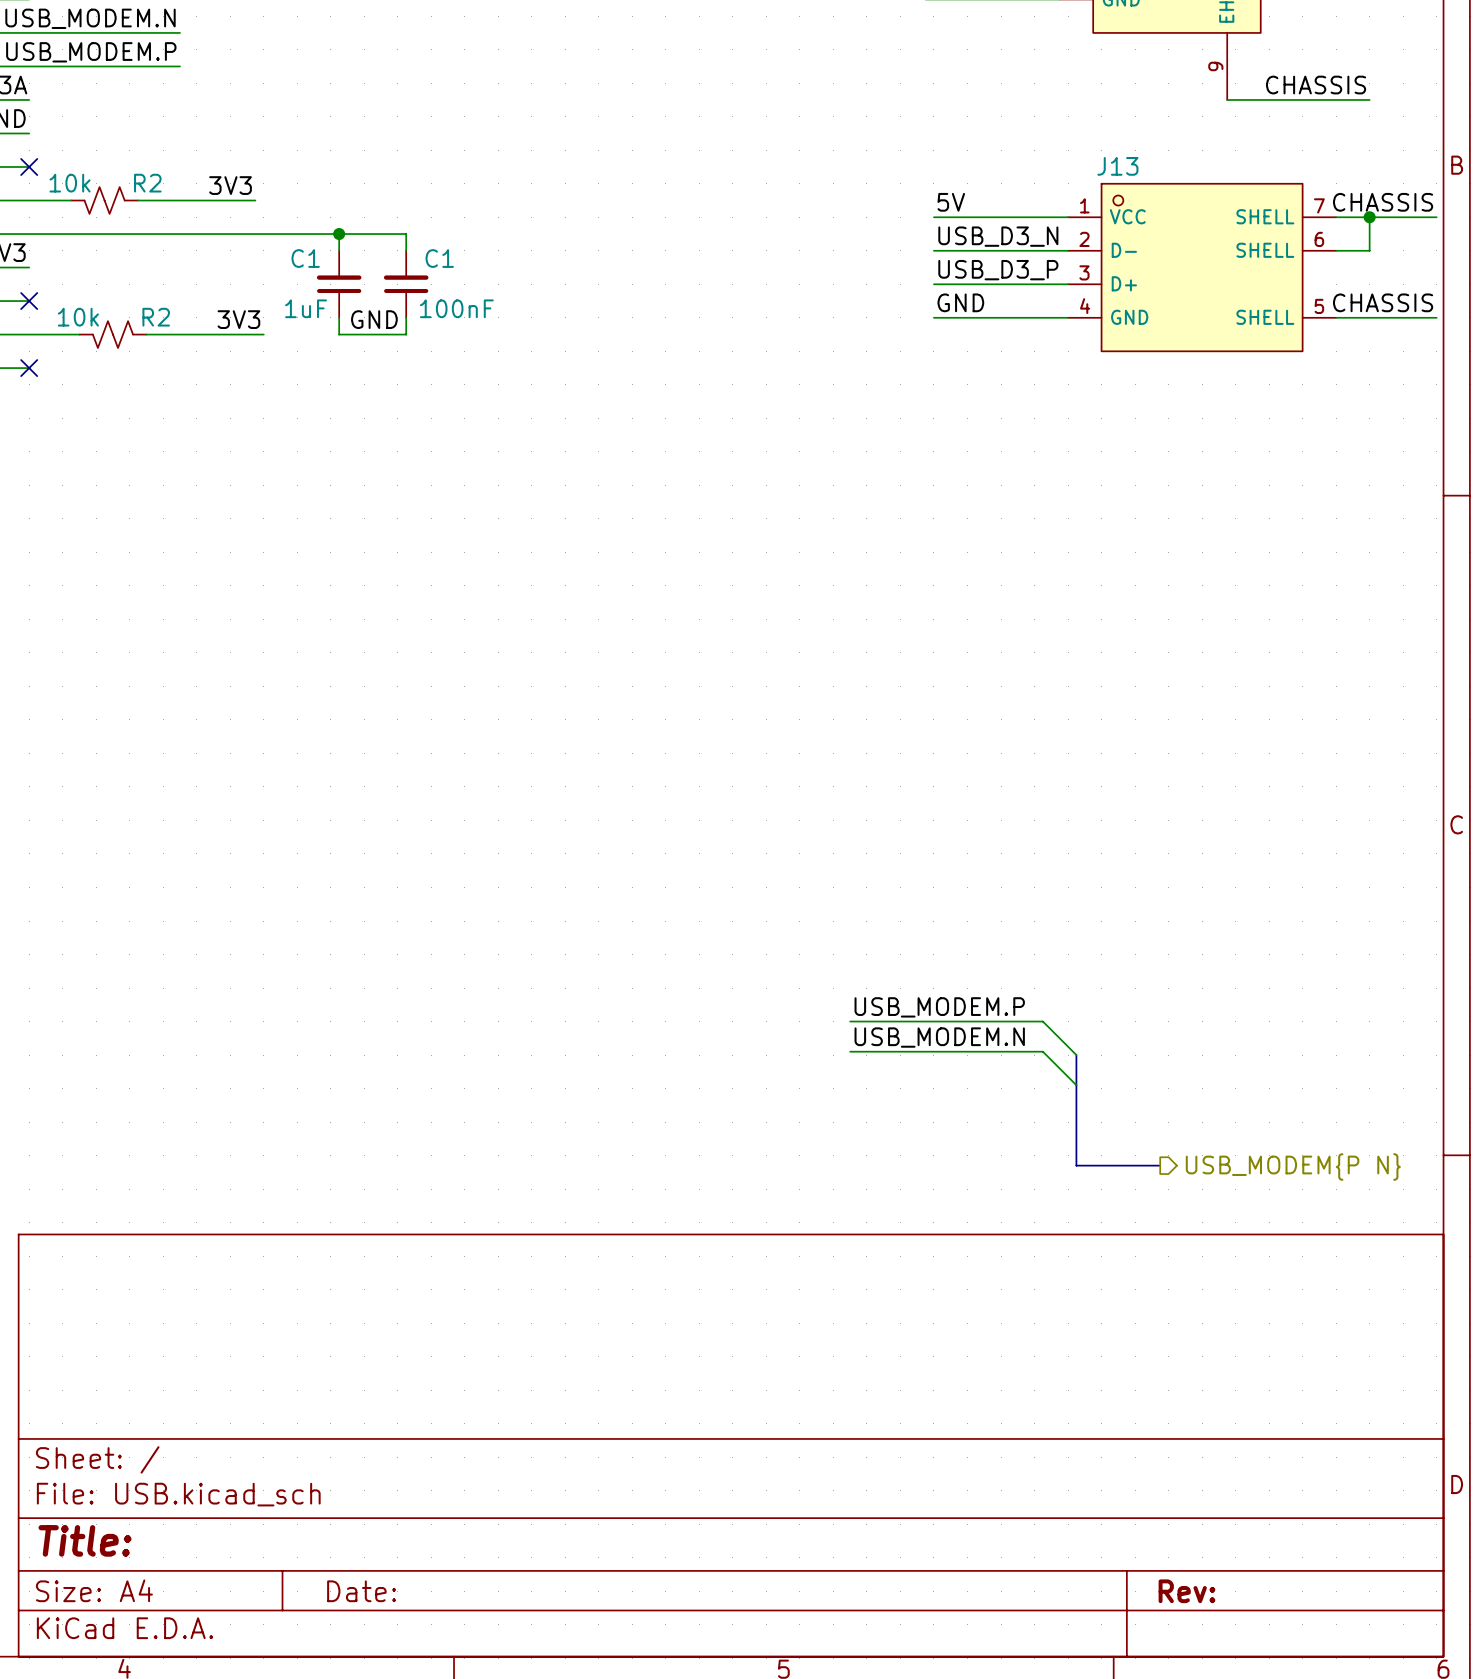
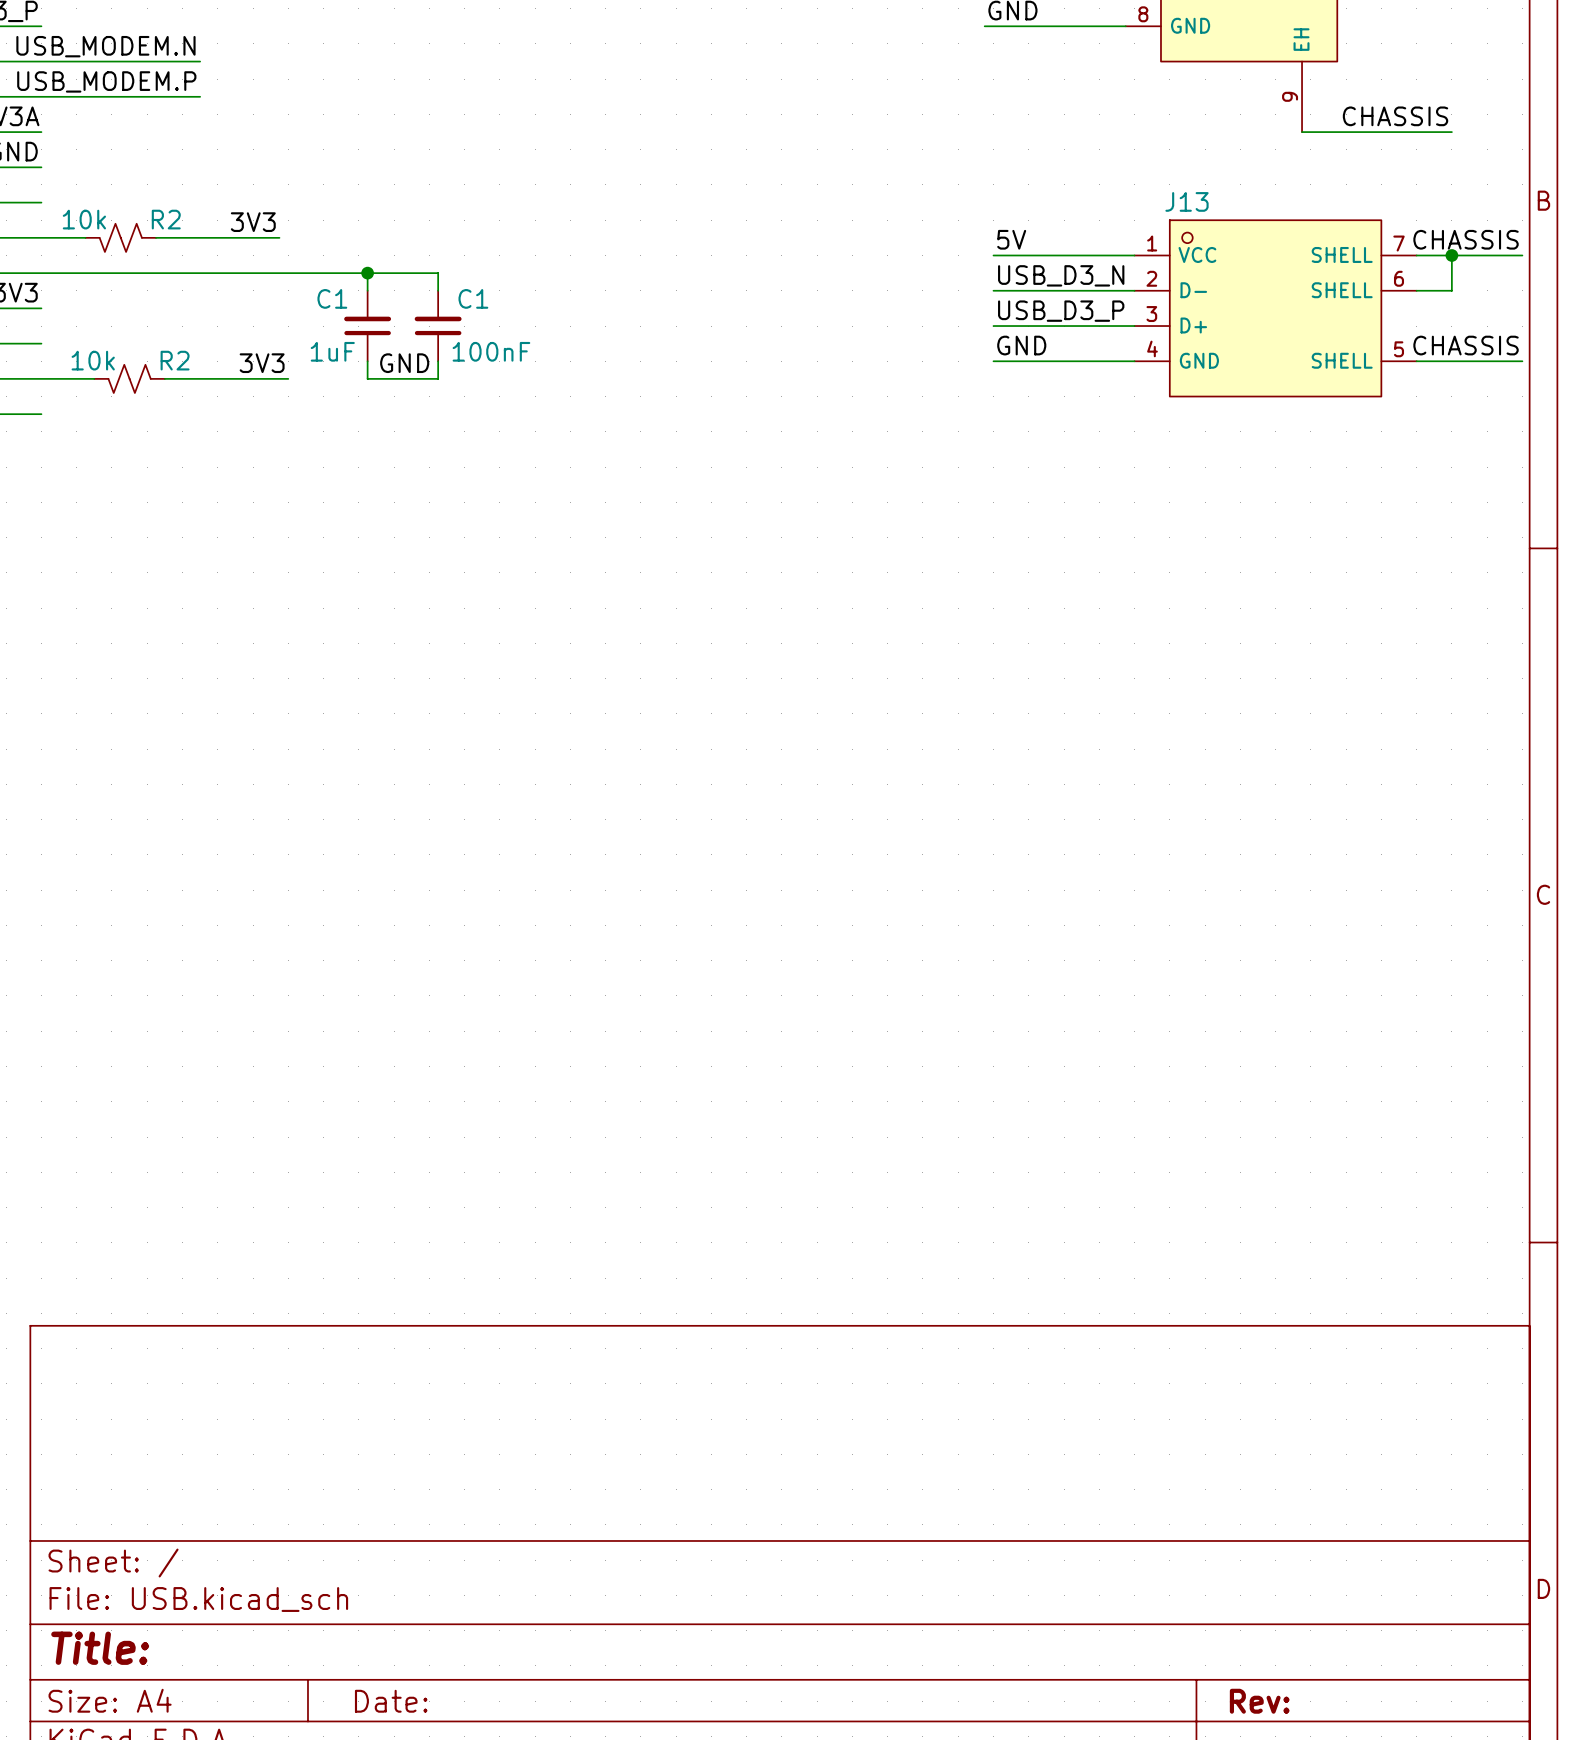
no-connect mark: (29, 167) -> none
no-connect mark: (29, 301) -> none
no-connect mark: (29, 368) -> none
label: USB_MODEM.P (939, 1007) -> none
wire: (850, 1021) (1042, 1021) -> none
wire: (1042, 1021) (1076, 1055) -> none
label: USB_MODEM.N (939, 1037) -> none
wire: (850, 1051) (1042, 1051) -> none
wire: (1042, 1051) (1076, 1085) -> none
bus: (1076, 1055) (1076, 1165) (1160, 1165) -> none
hierarchical label: USB_MODEM{P N} (1293, 1167) -> none

